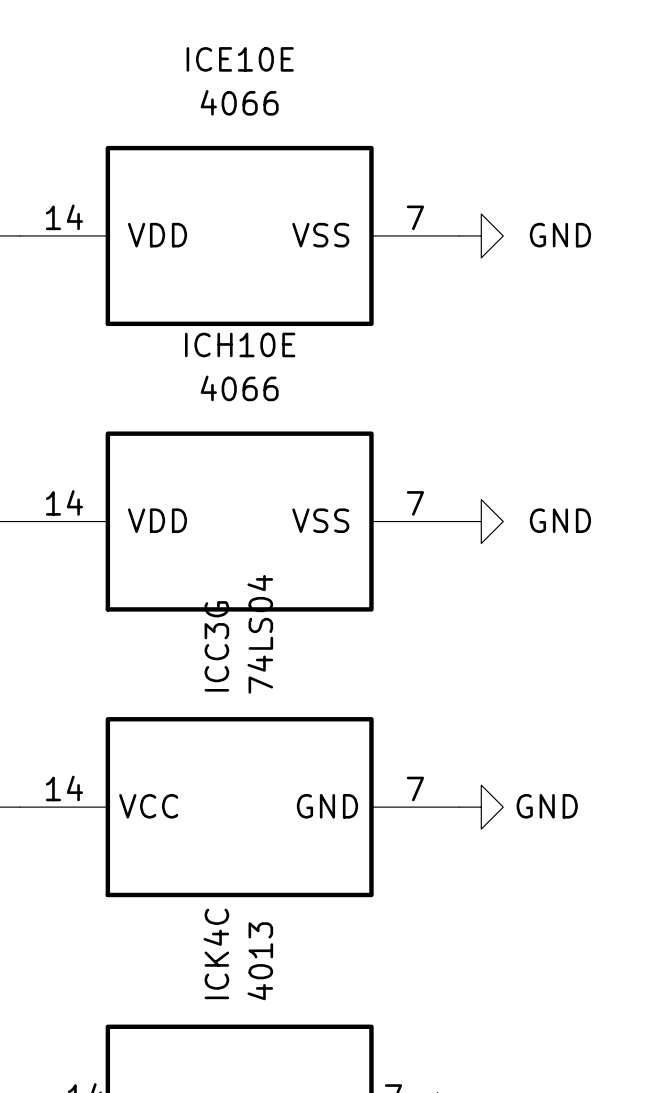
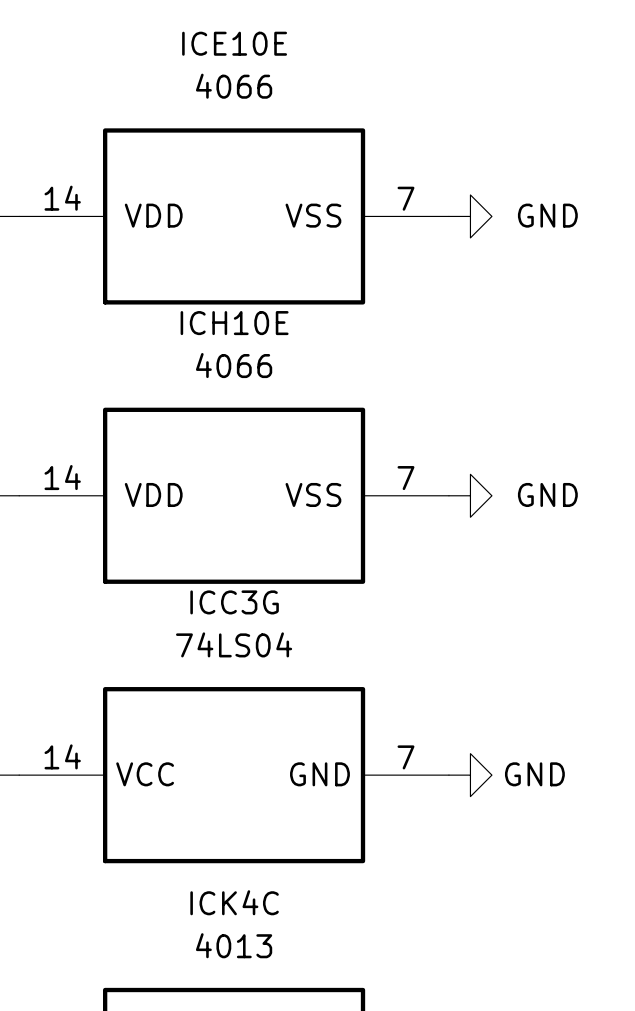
ICC3G value rotation: 0° (260, 634) -> 90° clockwise (234, 644)
ICC3G name rotation: 0° (216, 646) -> 90° clockwise (234, 602)
ICK4C name rotation: 0° (216, 953) -> 90° clockwise (234, 902)
ICK4C value rotation: 0° (260, 961) -> 90° clockwise (234, 945)

